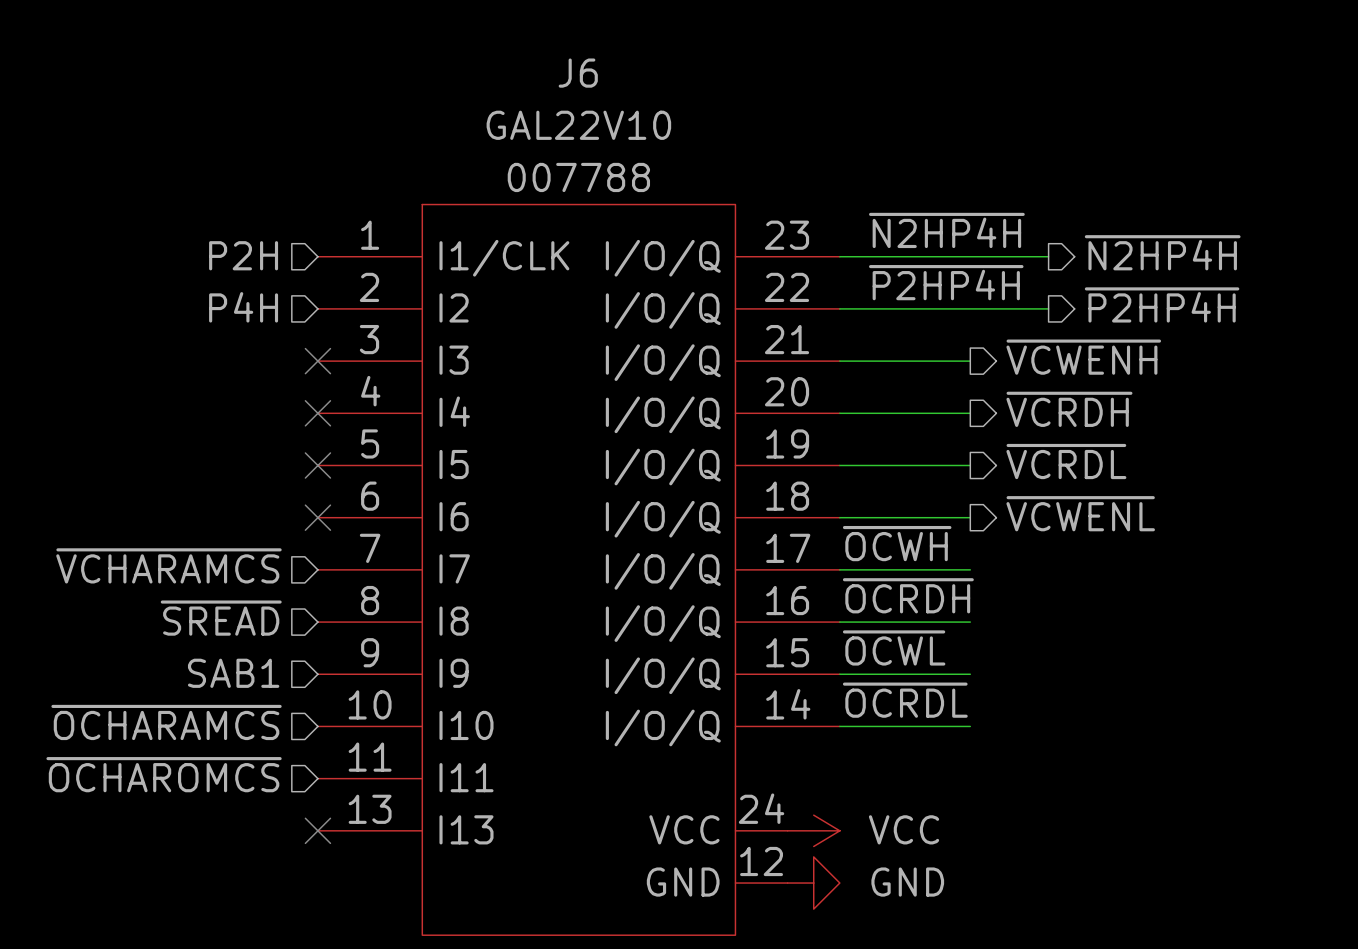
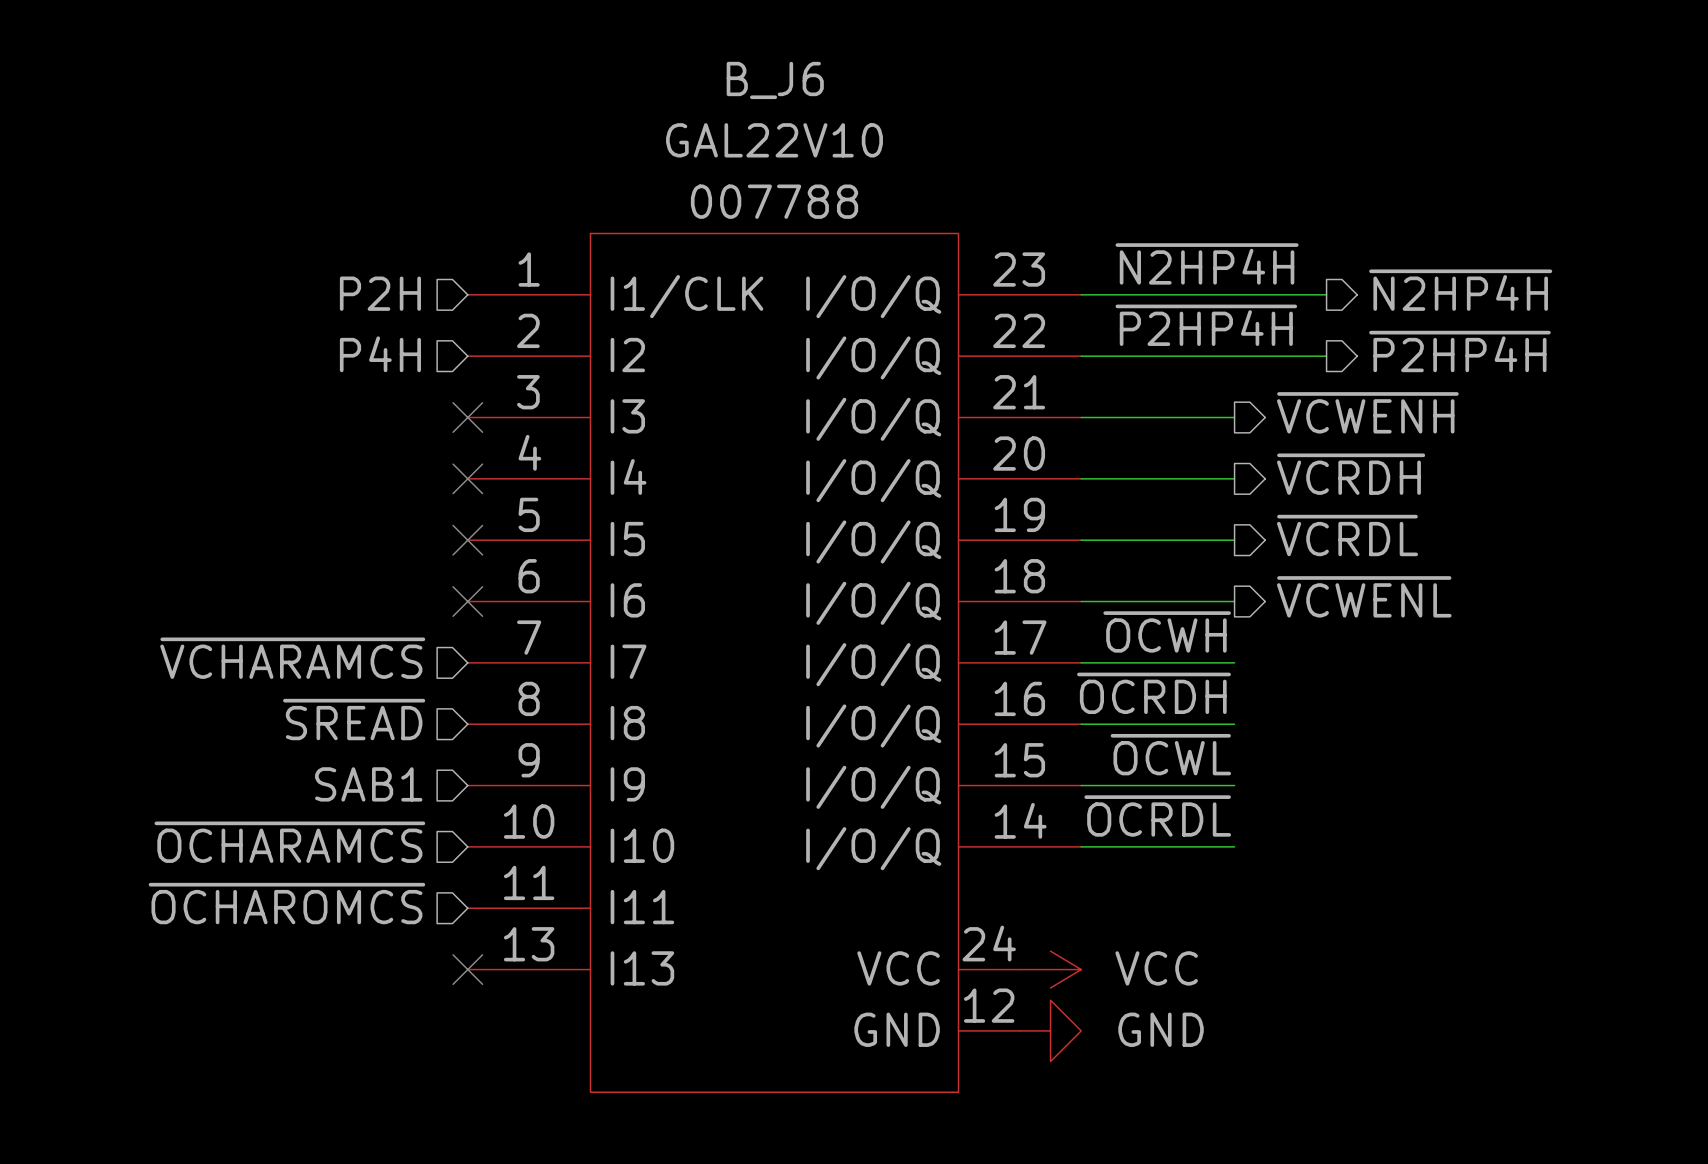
J6 name: J6 (578, 73) -> B_J6 (775, 80)
label position: ~{OCWH} (897, 543) -> ~{OCWH} (1167, 631)
label position: ~{OCRDH} (908, 595) -> ~{OCRDH} (1154, 693)
label position: ~{OCWL} (894, 647) -> ~{OCWL} (1170, 754)
label position: ~{OCRDL} (905, 700) -> ~{OCRDL} (1157, 815)

